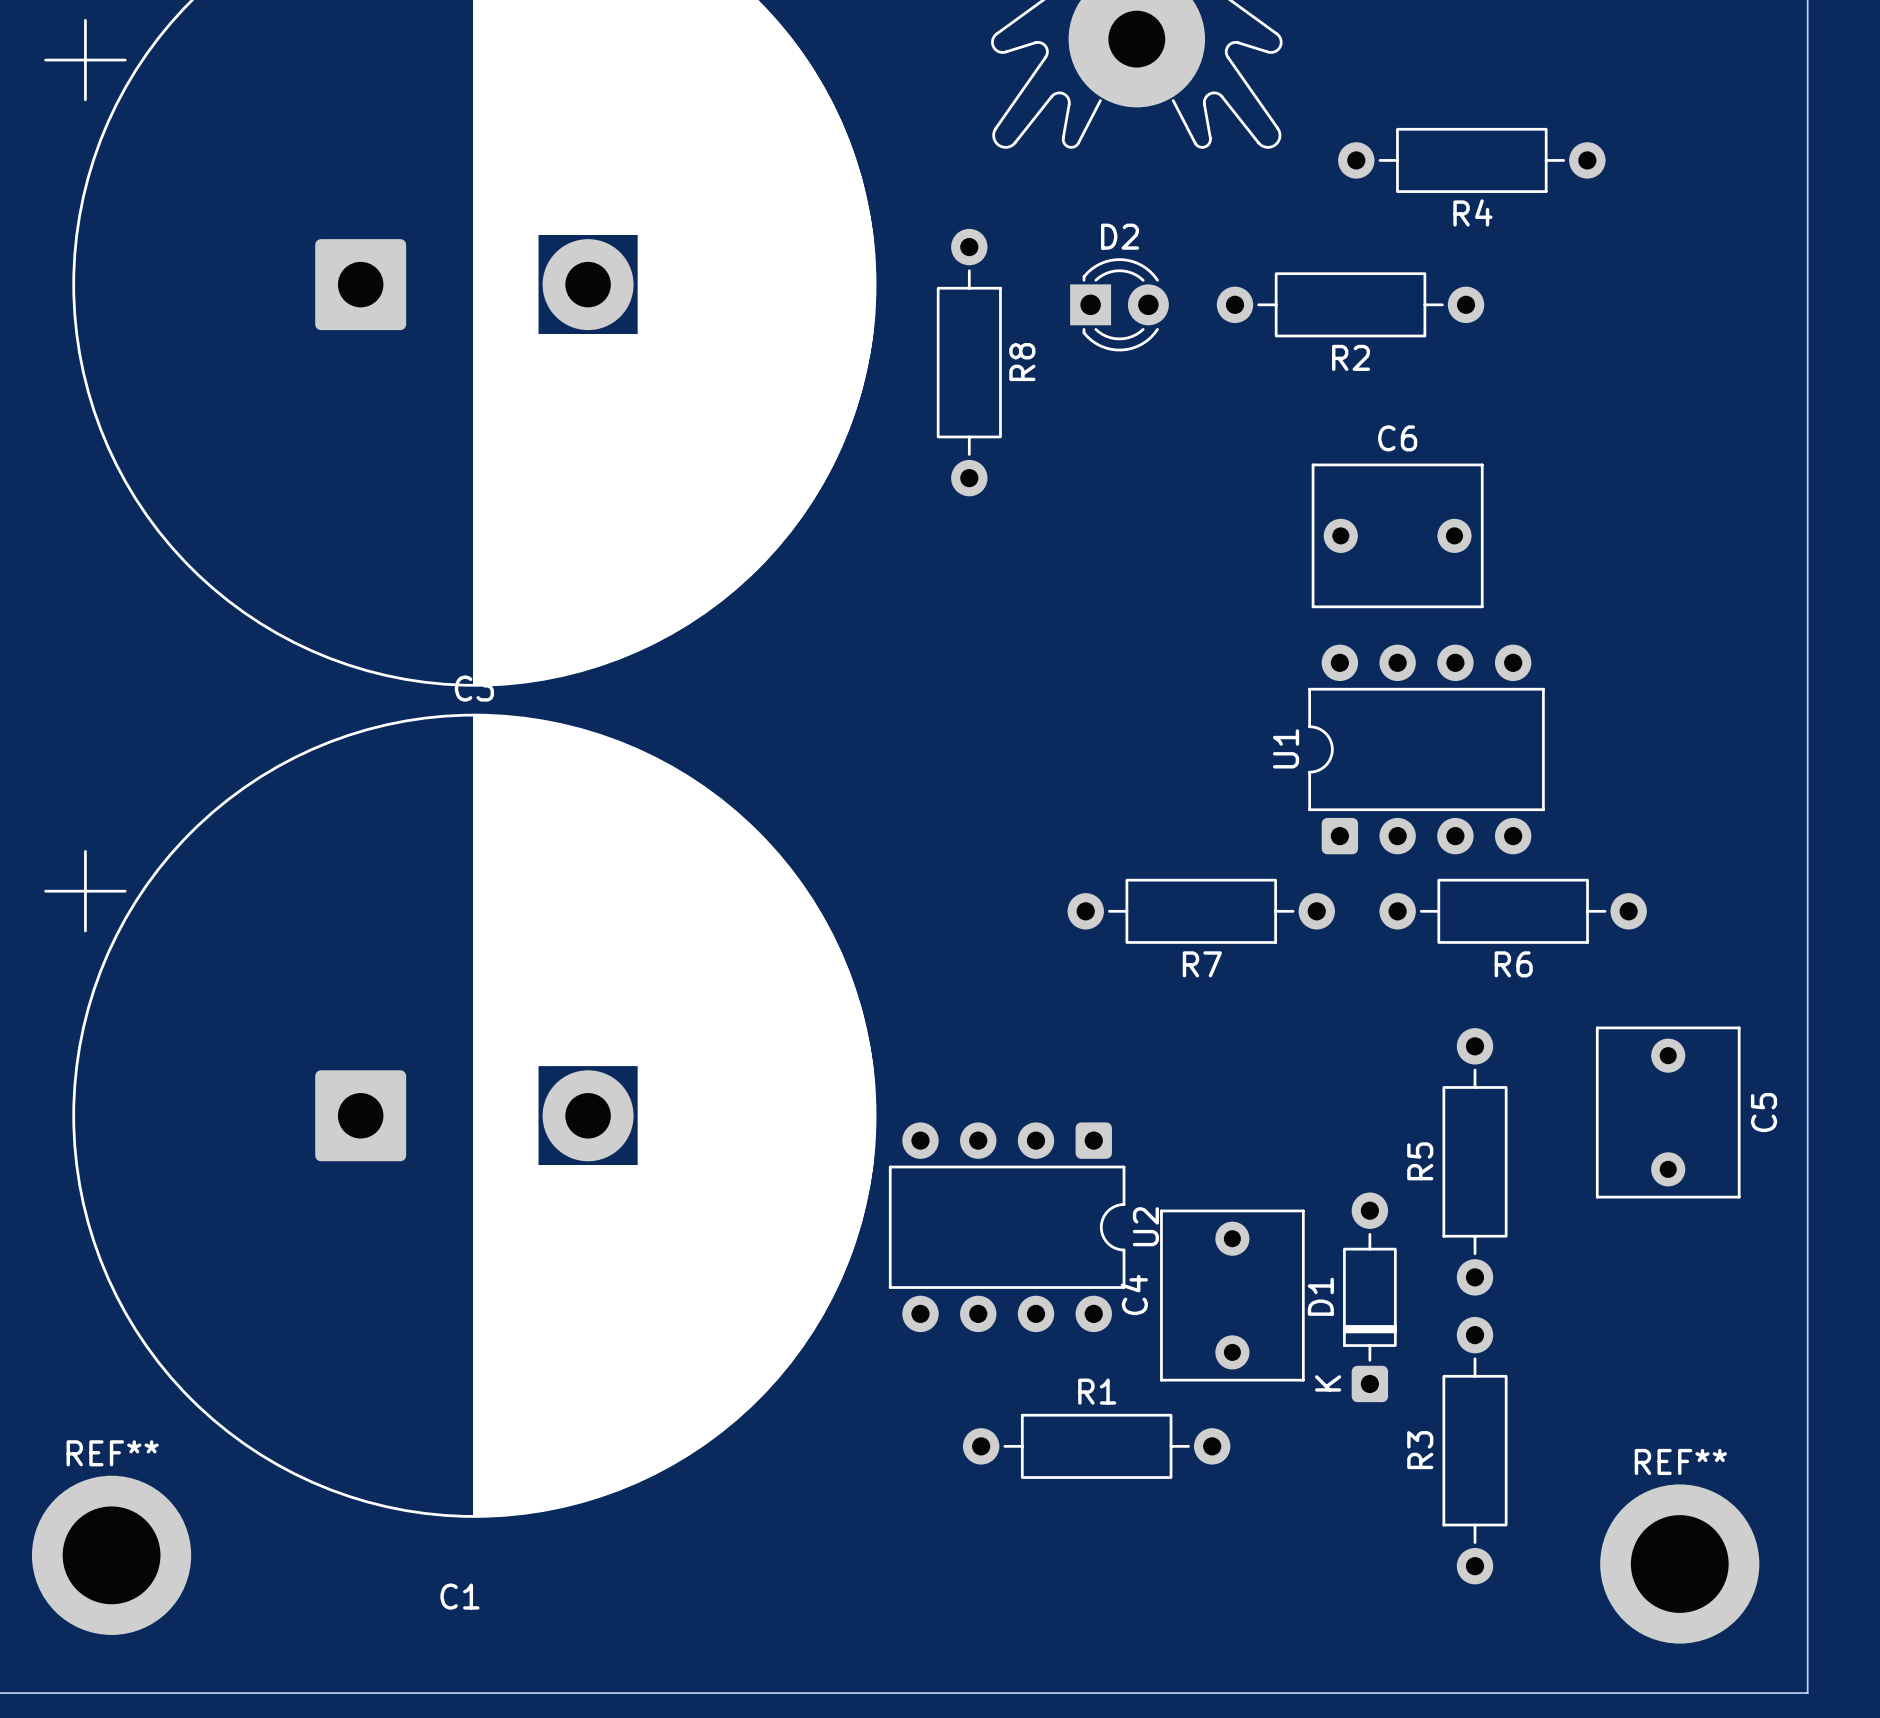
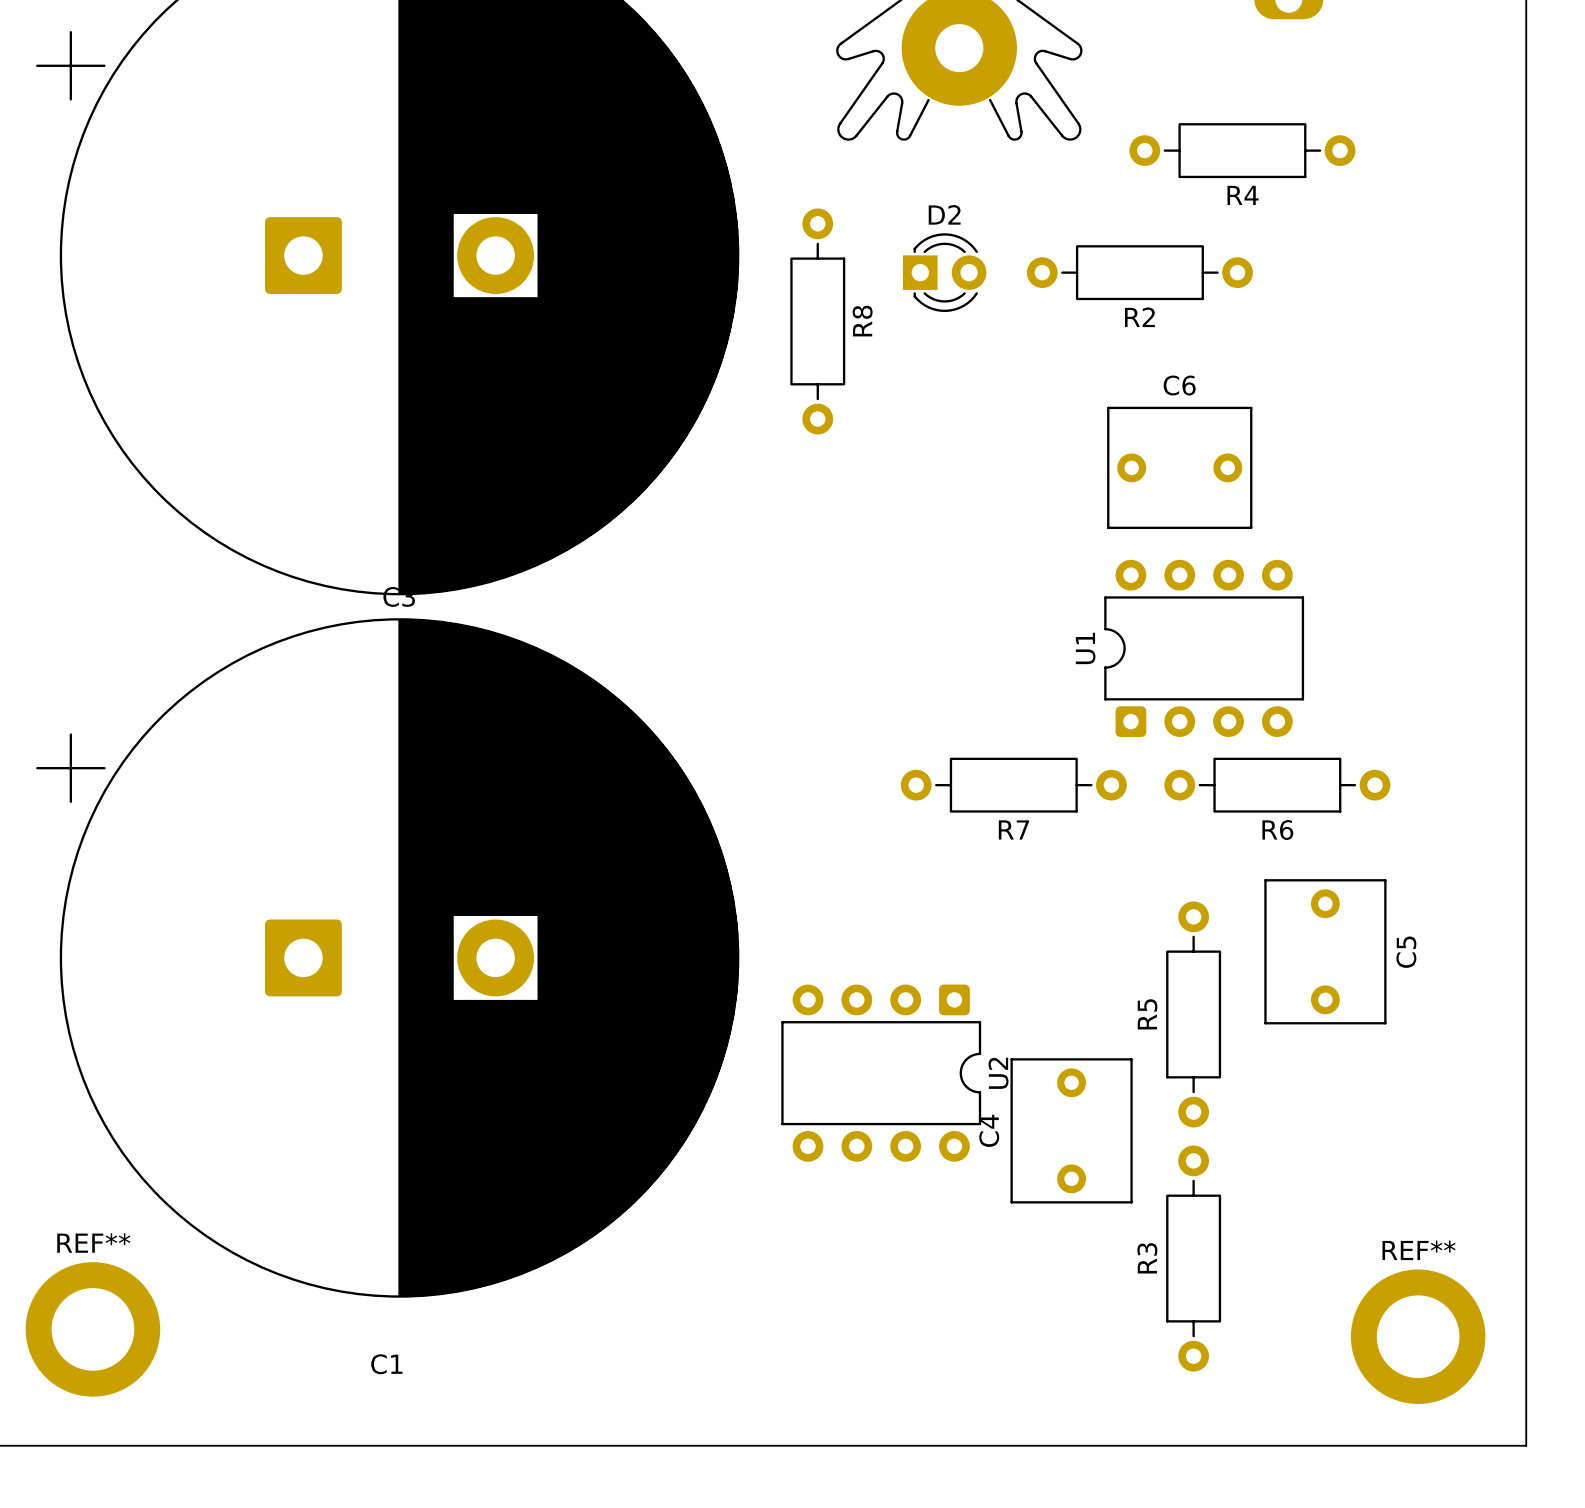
C5 position: (1668, 1112) -> (1325, 951)
R5 position: (1475, 1161) -> (1193, 1014)
U2 position: (1007, 1227) -> (881, 1073)
C4 position: (1232, 1295) -> (1071, 1130)
D1: (1369, 1297) -> none
R1: (1096, 1446) -> none
R3 position: (1475, 1450) -> (1193, 1258)

